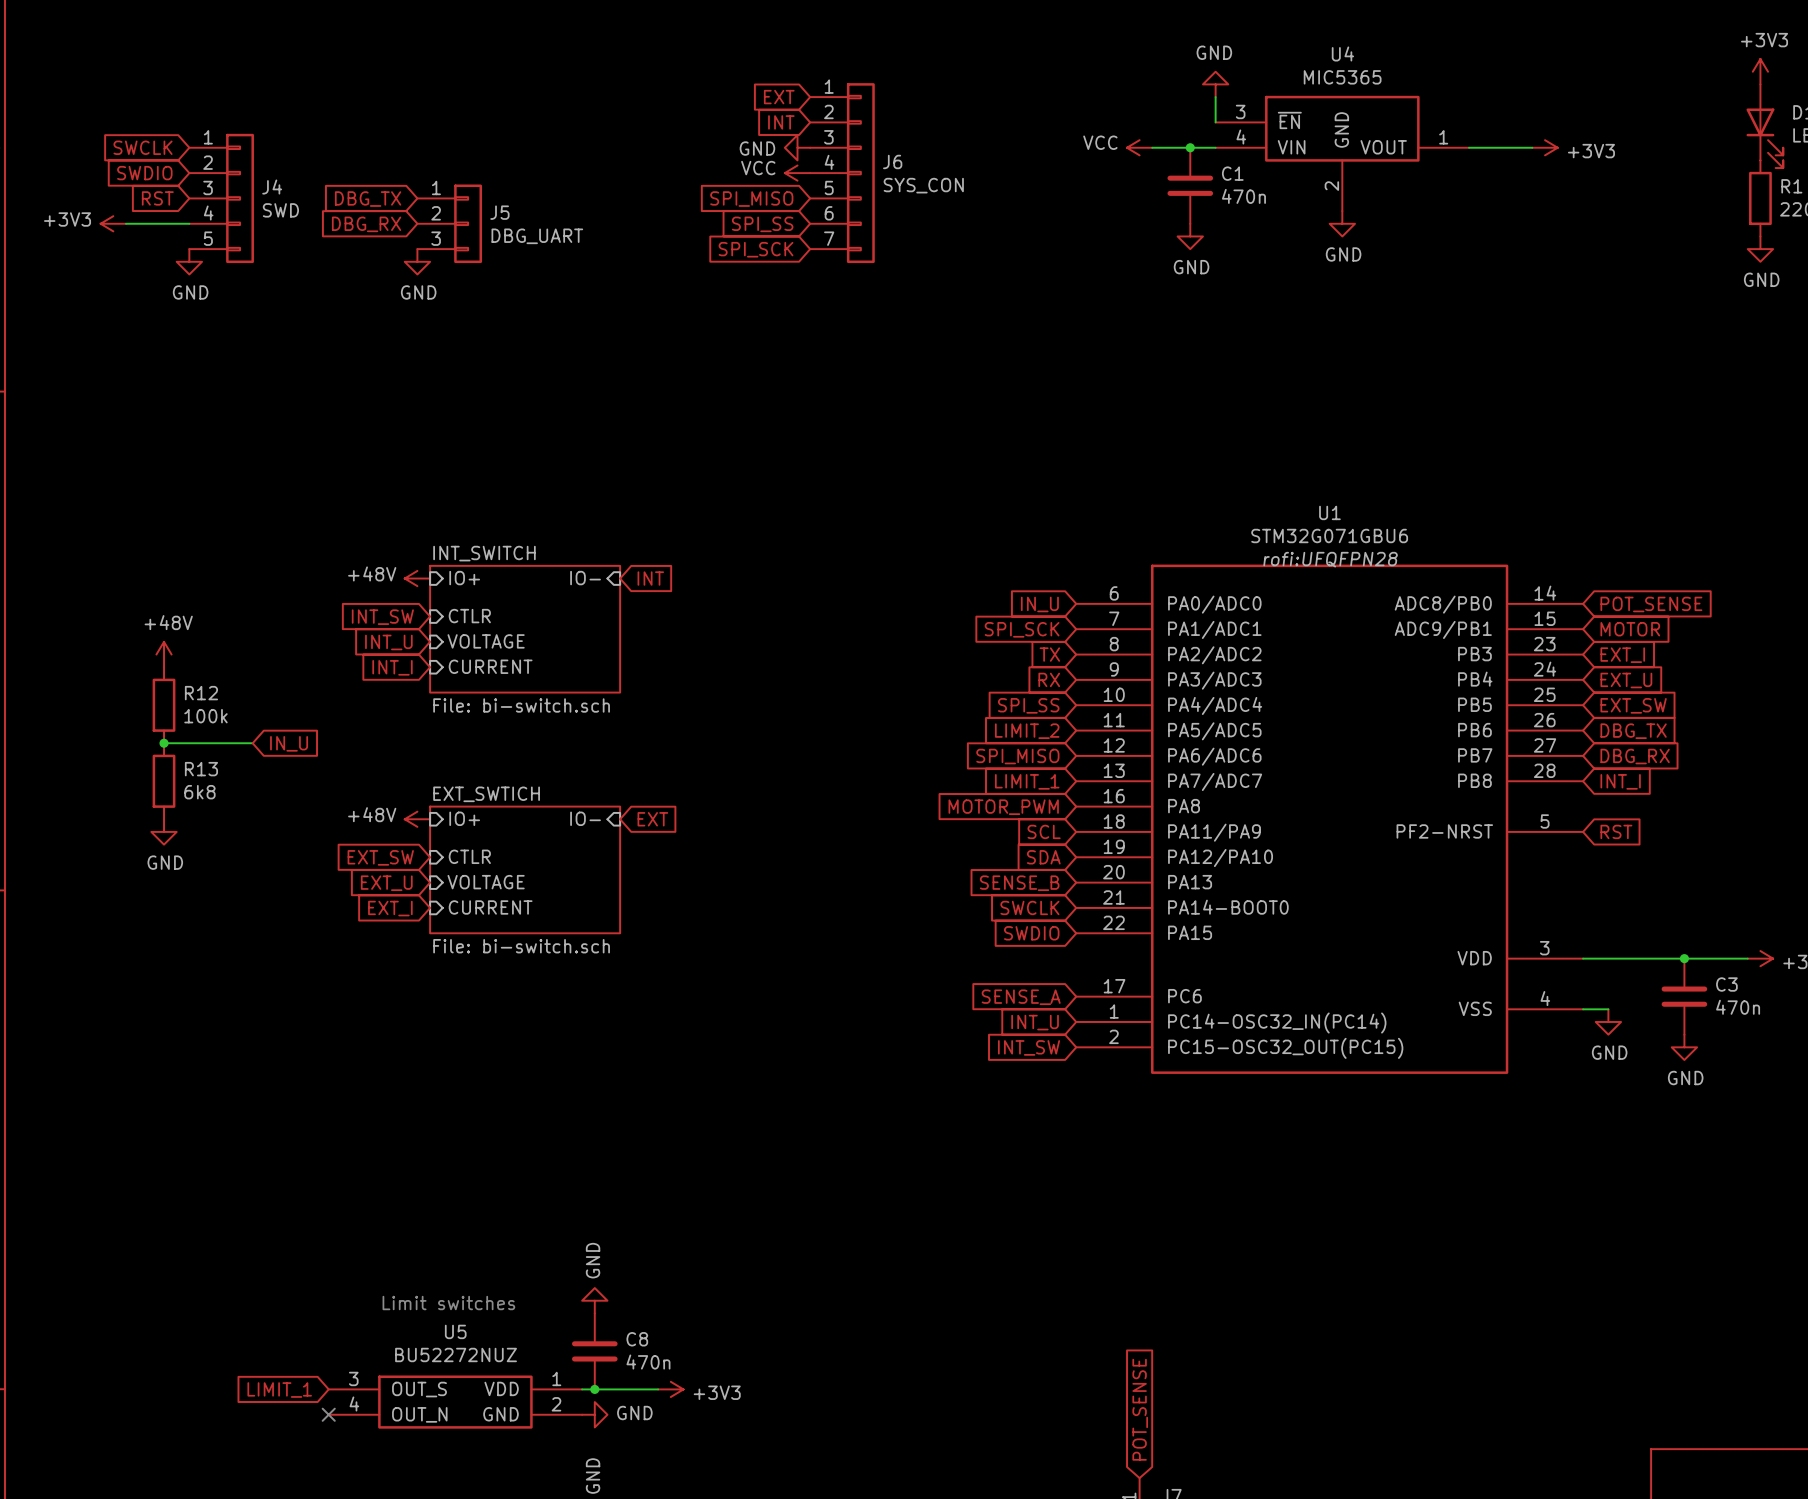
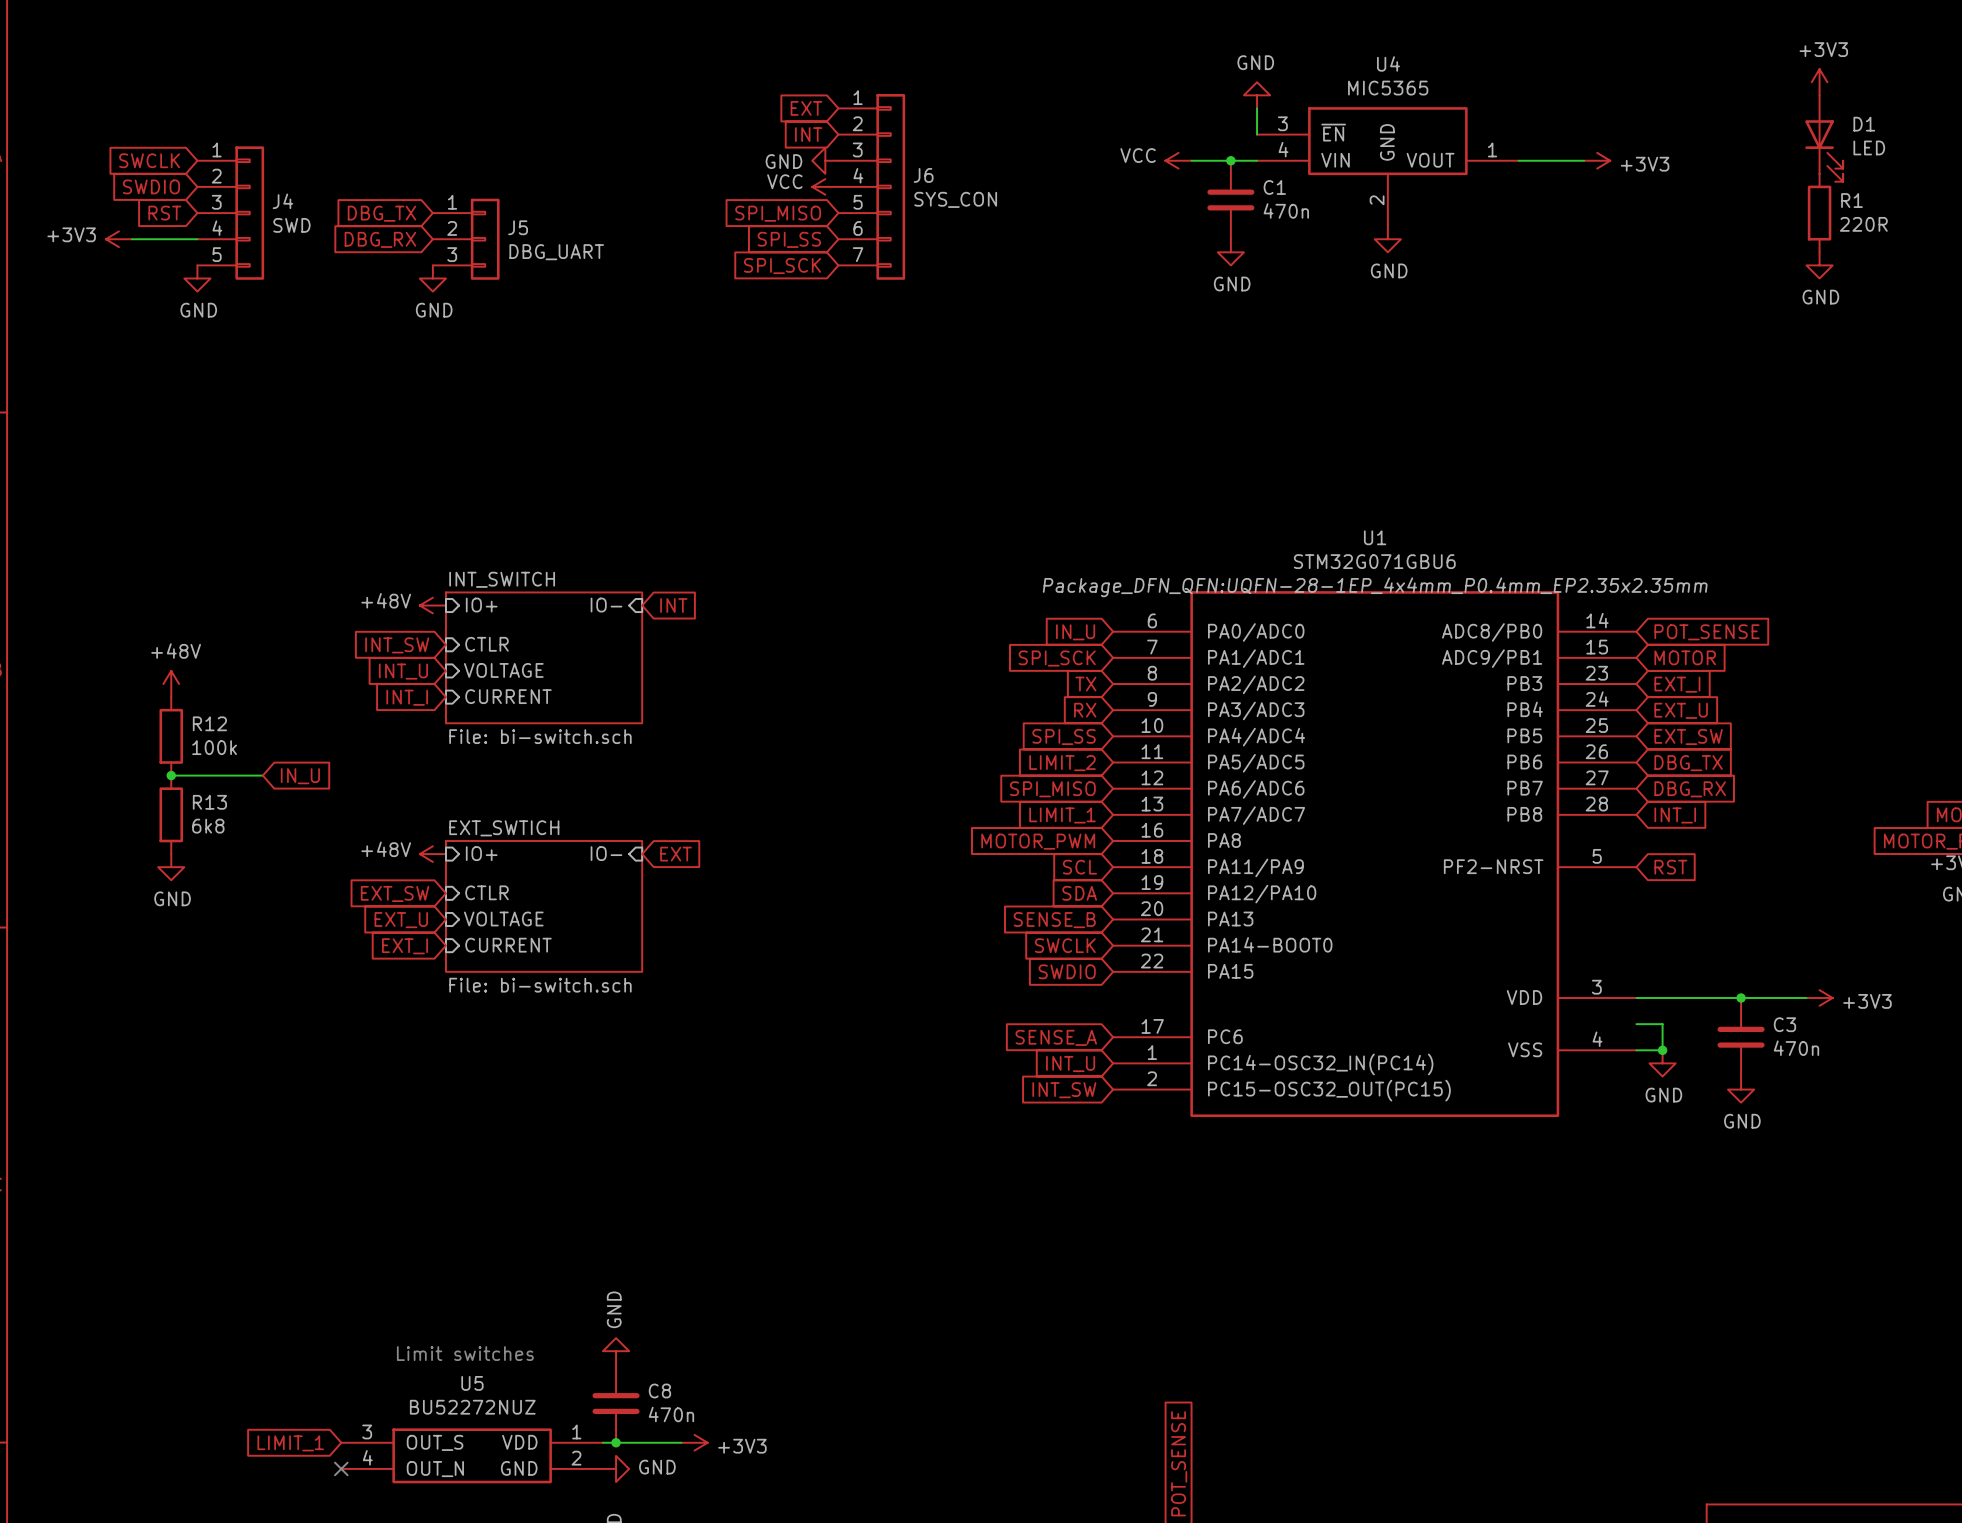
U1 text: rofi:UFQFPN28 (1330, 559) -> Package_DFN_QFN:UQFN-28-1EP_4x4mm_P0.4mm_EP2.35x2.35mm (1375, 587)
wire: none -> (1636, 1024) (1662, 1024) (1662, 1050)
junction: none -> (1662, 1050)

